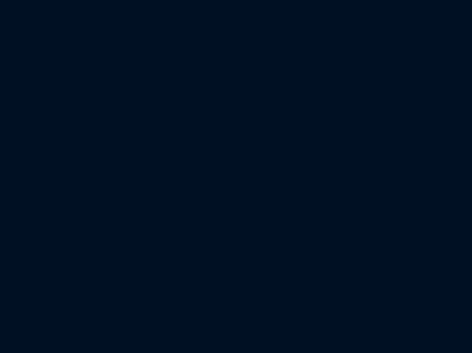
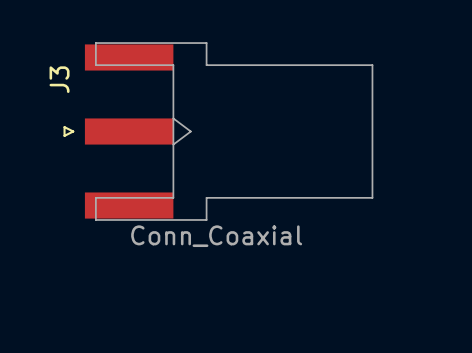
J3: none -> Conn_Coaxial (218, 131)

